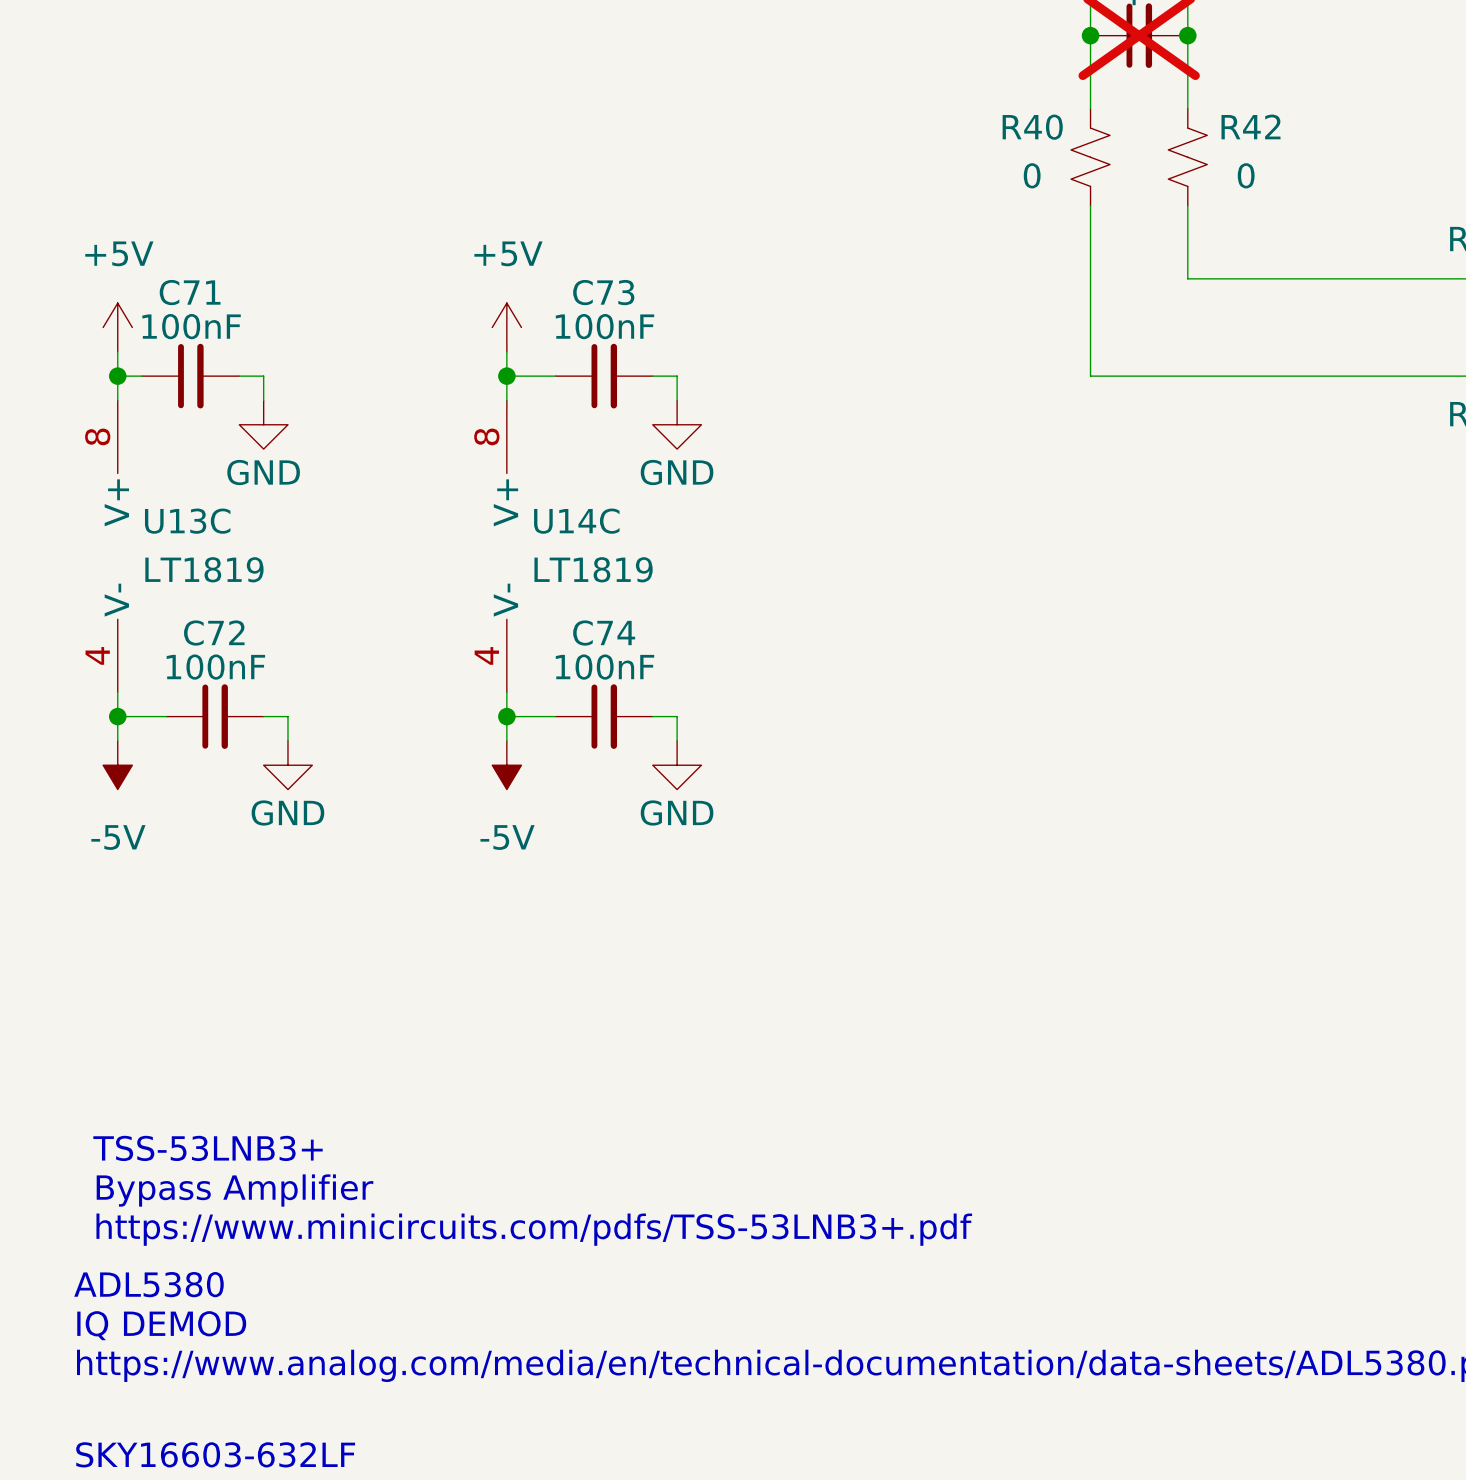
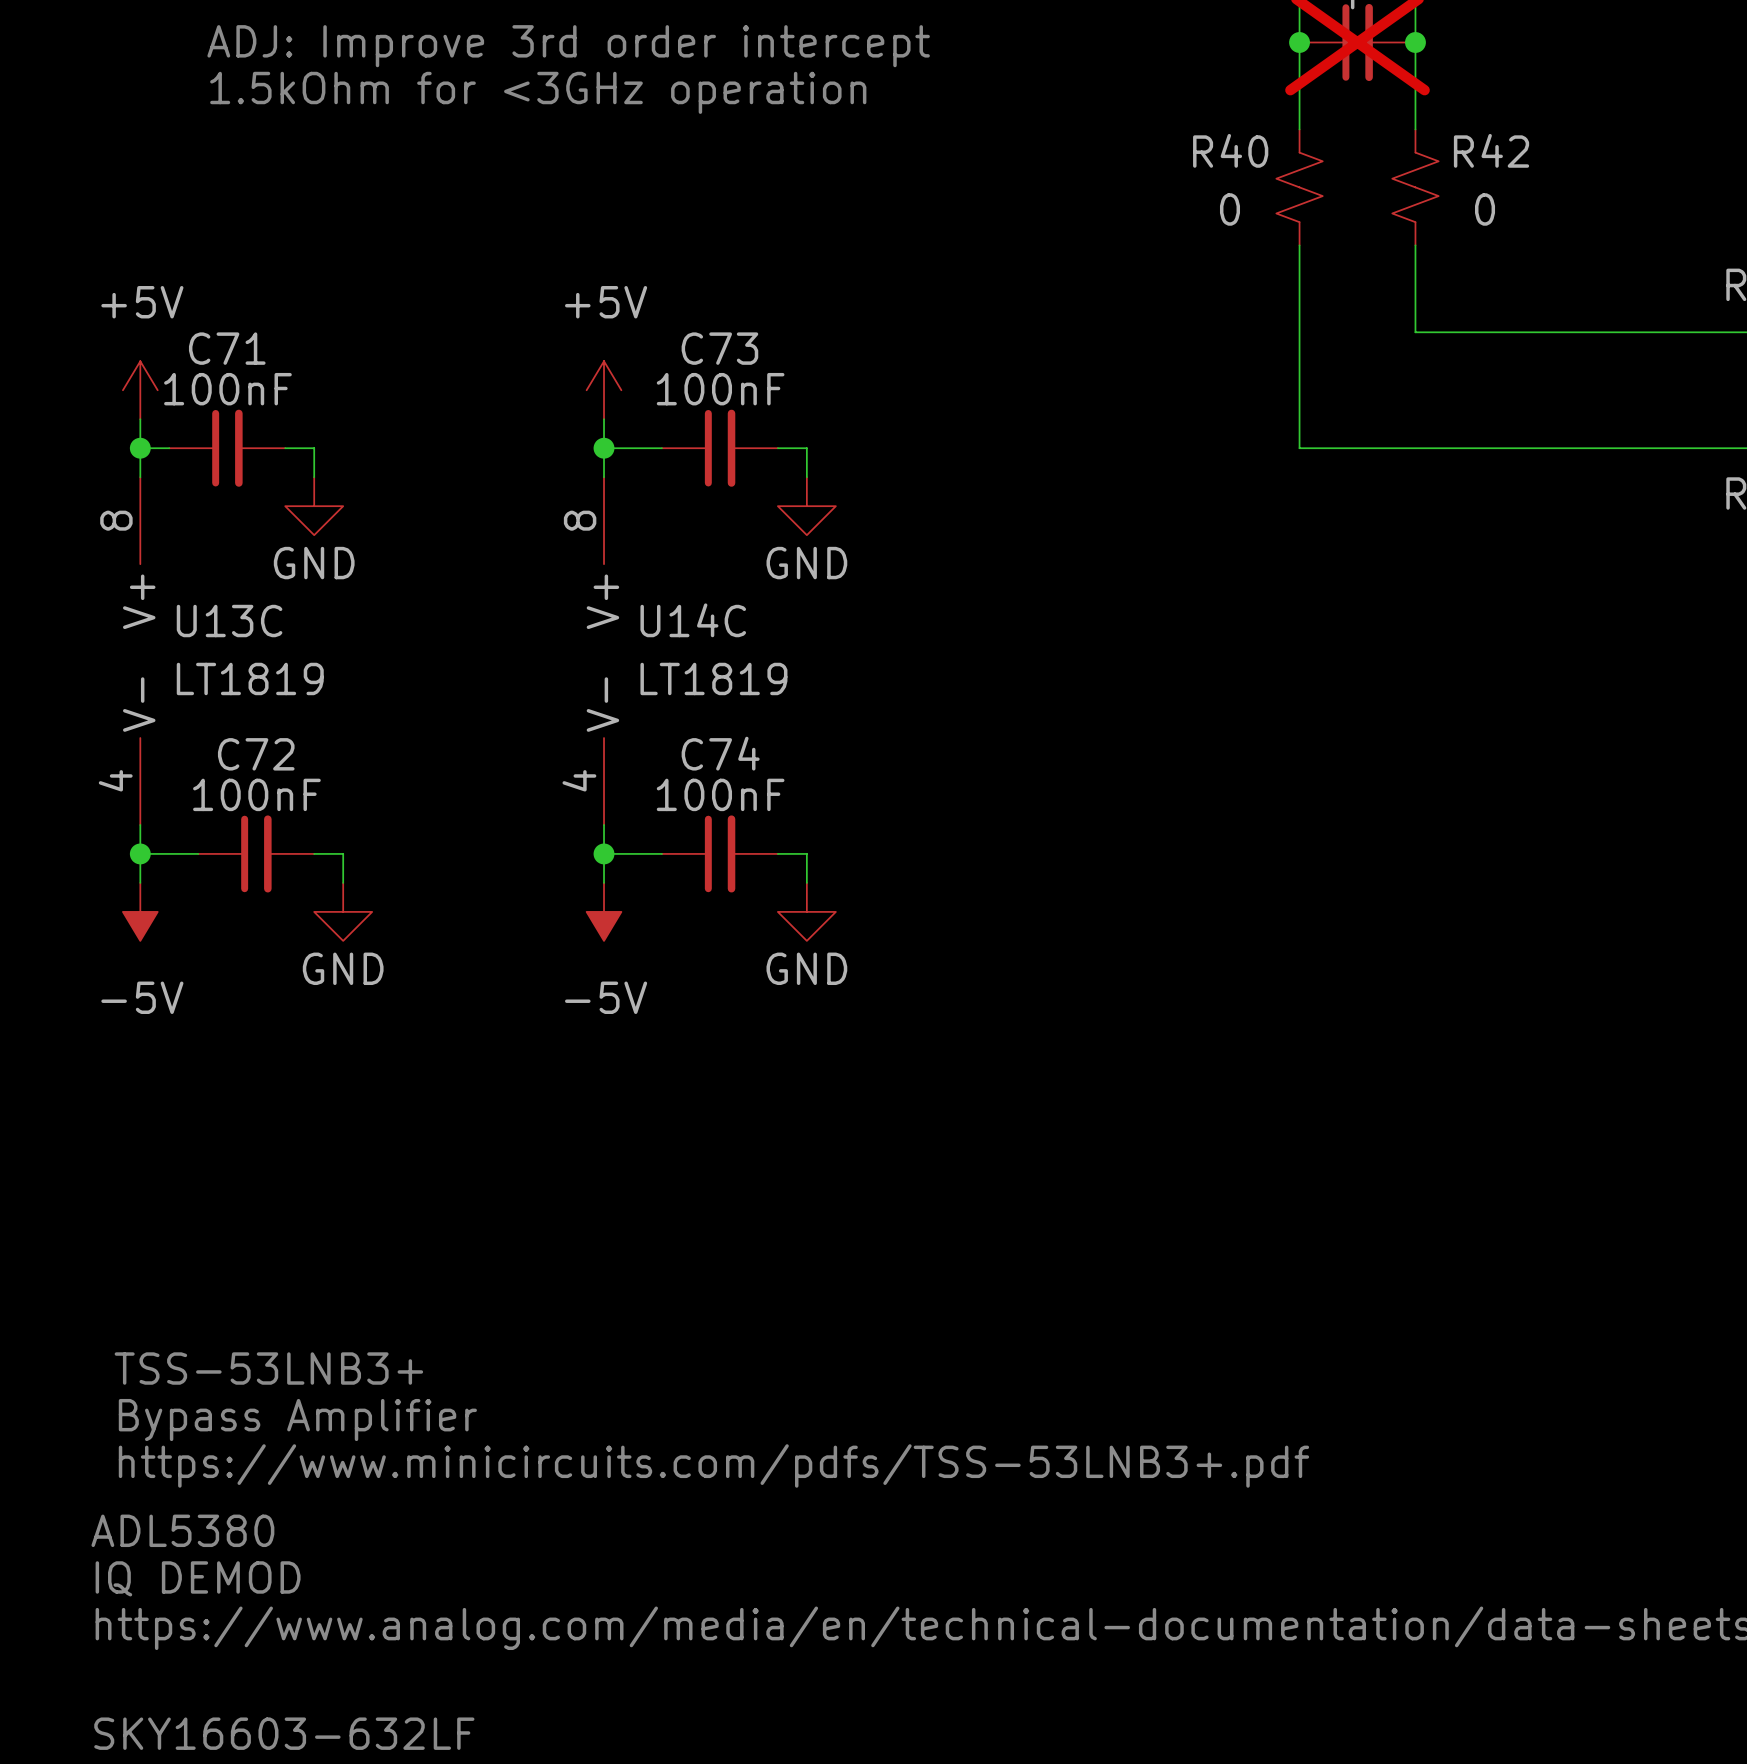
text: none -> ADJ: Improve 3rd order intercept (568, 46)
text: none -> 1.5kOhm for <3GHz operation (538, 92)

